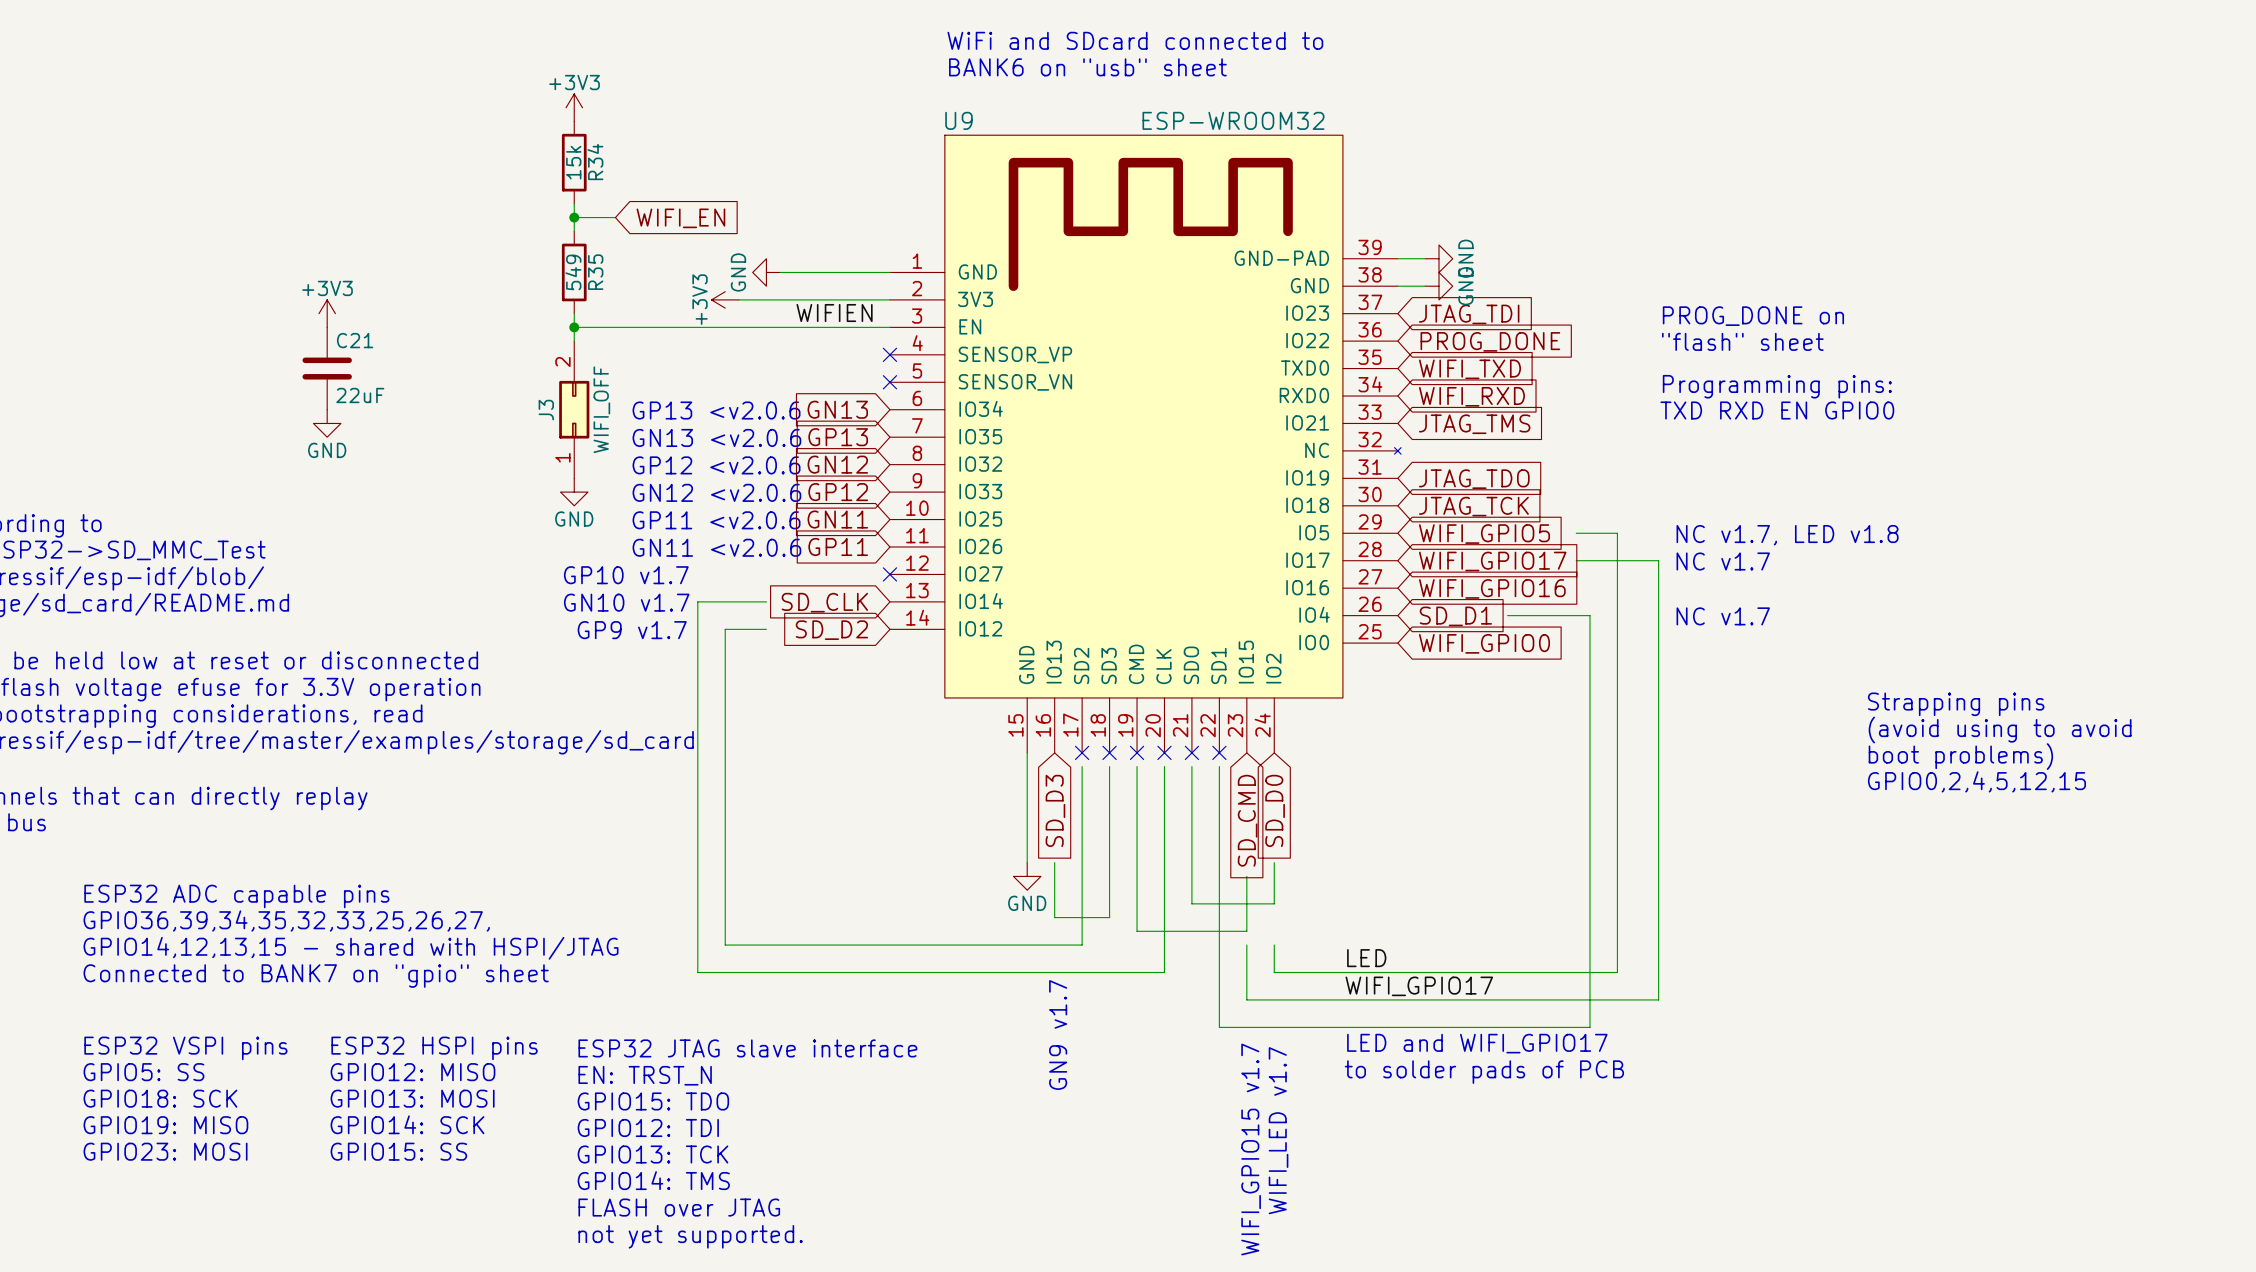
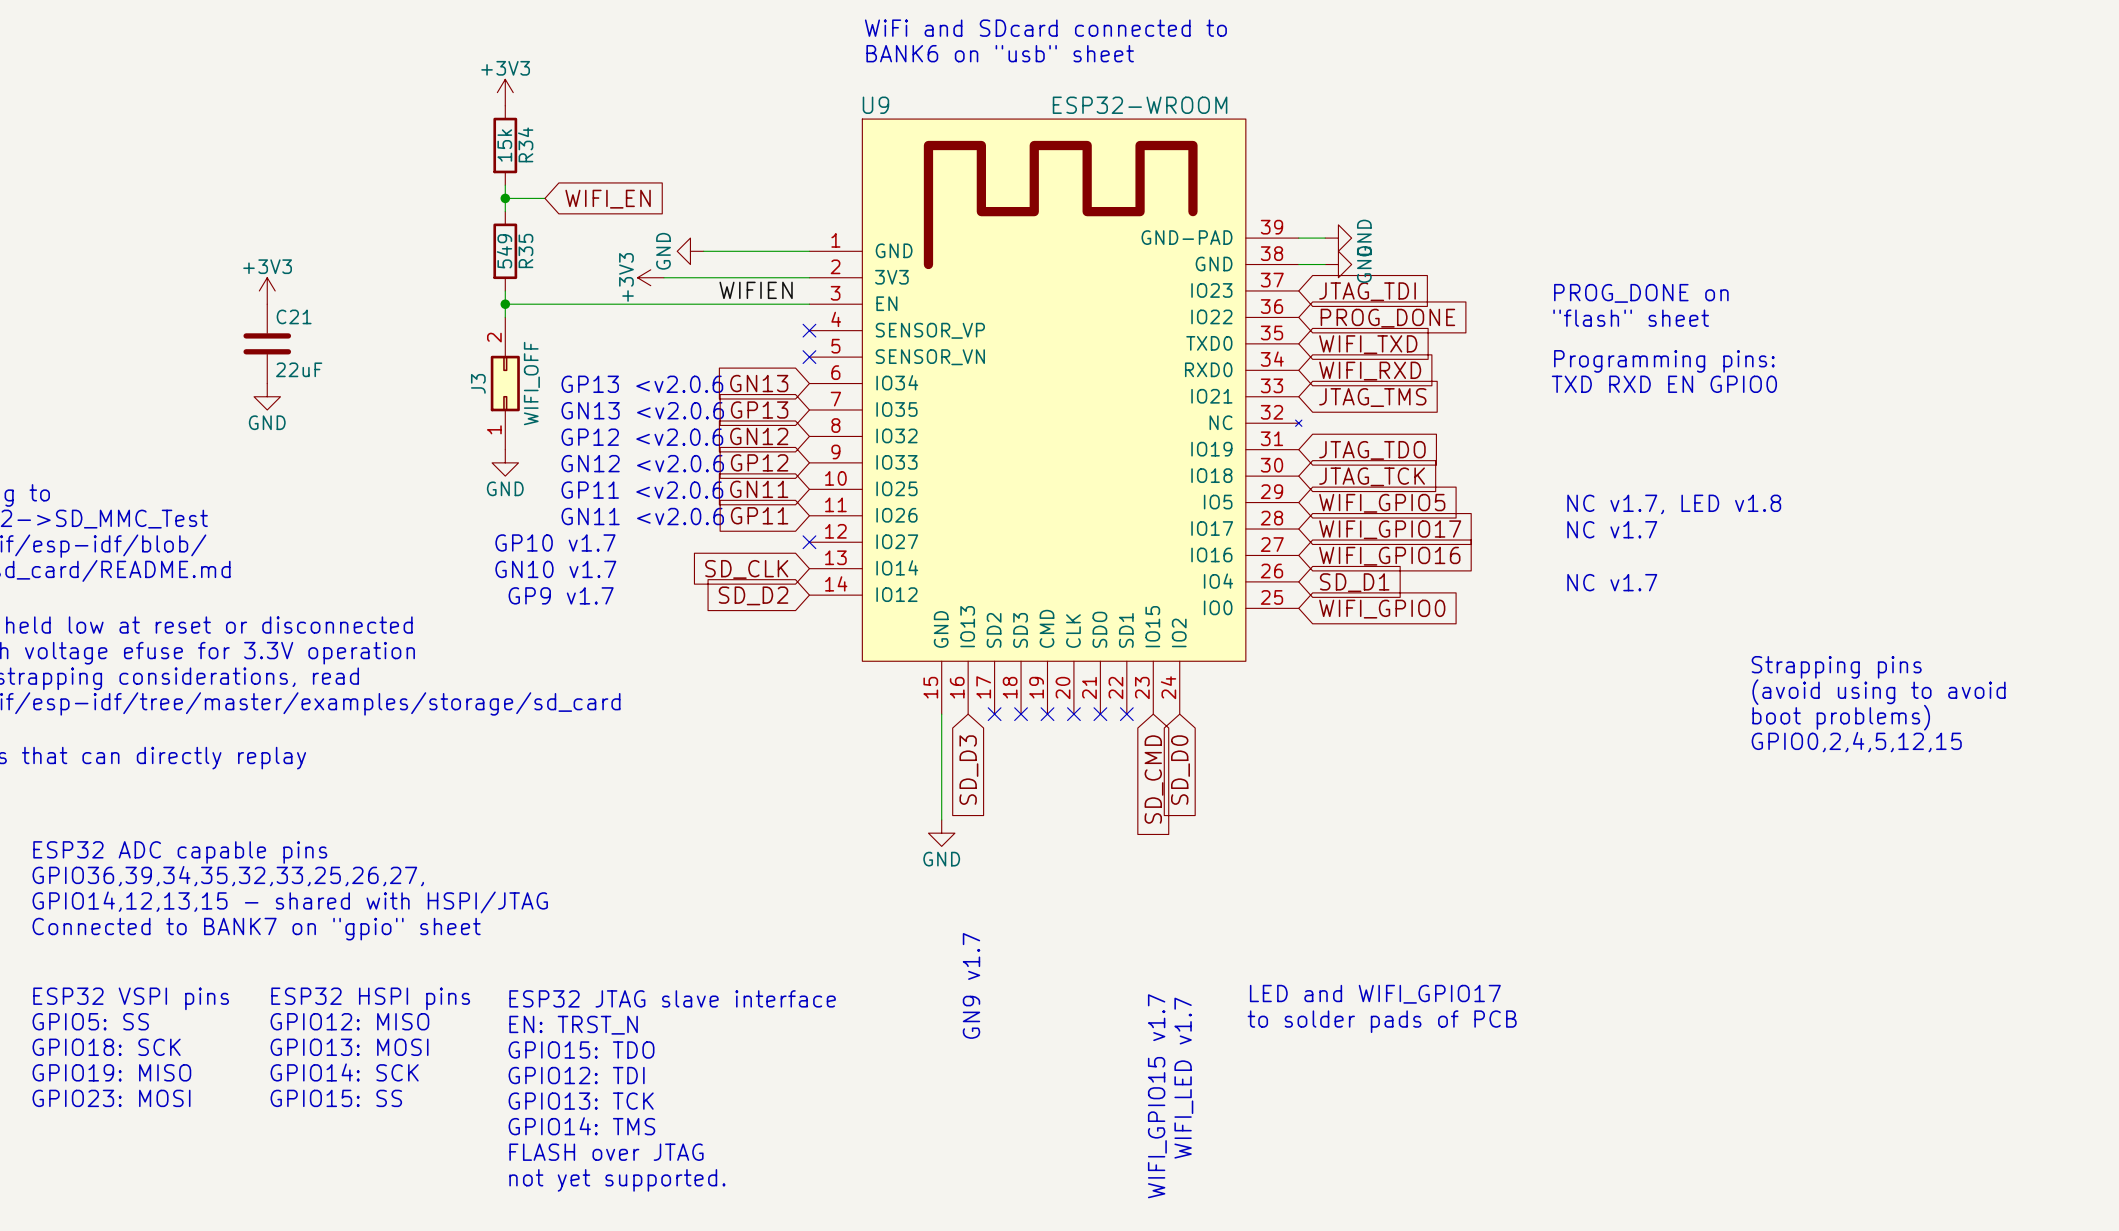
U9 value: ESP-WROOM32 (1233, 120) -> ESP32-WROOM (1140, 105)
wire: (1576, 533) (1617, 533) (1617, 972) (1274, 972) (1274, 945) -> none
wire: (1576, 560) (1658, 560) (1658, 999) (1246, 999) (1246, 945) -> none
wire: (766, 601) (697, 601) (697, 972) (1164, 972) (1164, 766) -> none
wire: (1507, 615) (1589, 615) (1589, 1027) (1219, 1027) (1219, 766) -> none
wire: (766, 629) (725, 629) (725, 945) (1082, 945) (1082, 766) -> none
wire: (1109, 766) (1109, 917) (1054, 917) (1054, 862) -> none
wire: (1137, 766) (1137, 931) (1246, 931) (1246, 876) -> none
wire: (1191, 766) (1191, 903) (1274, 903) (1274, 862) -> none
label: LED (1366, 958) -> none
label: WIFI_GPIO17 (1419, 986) -> none

